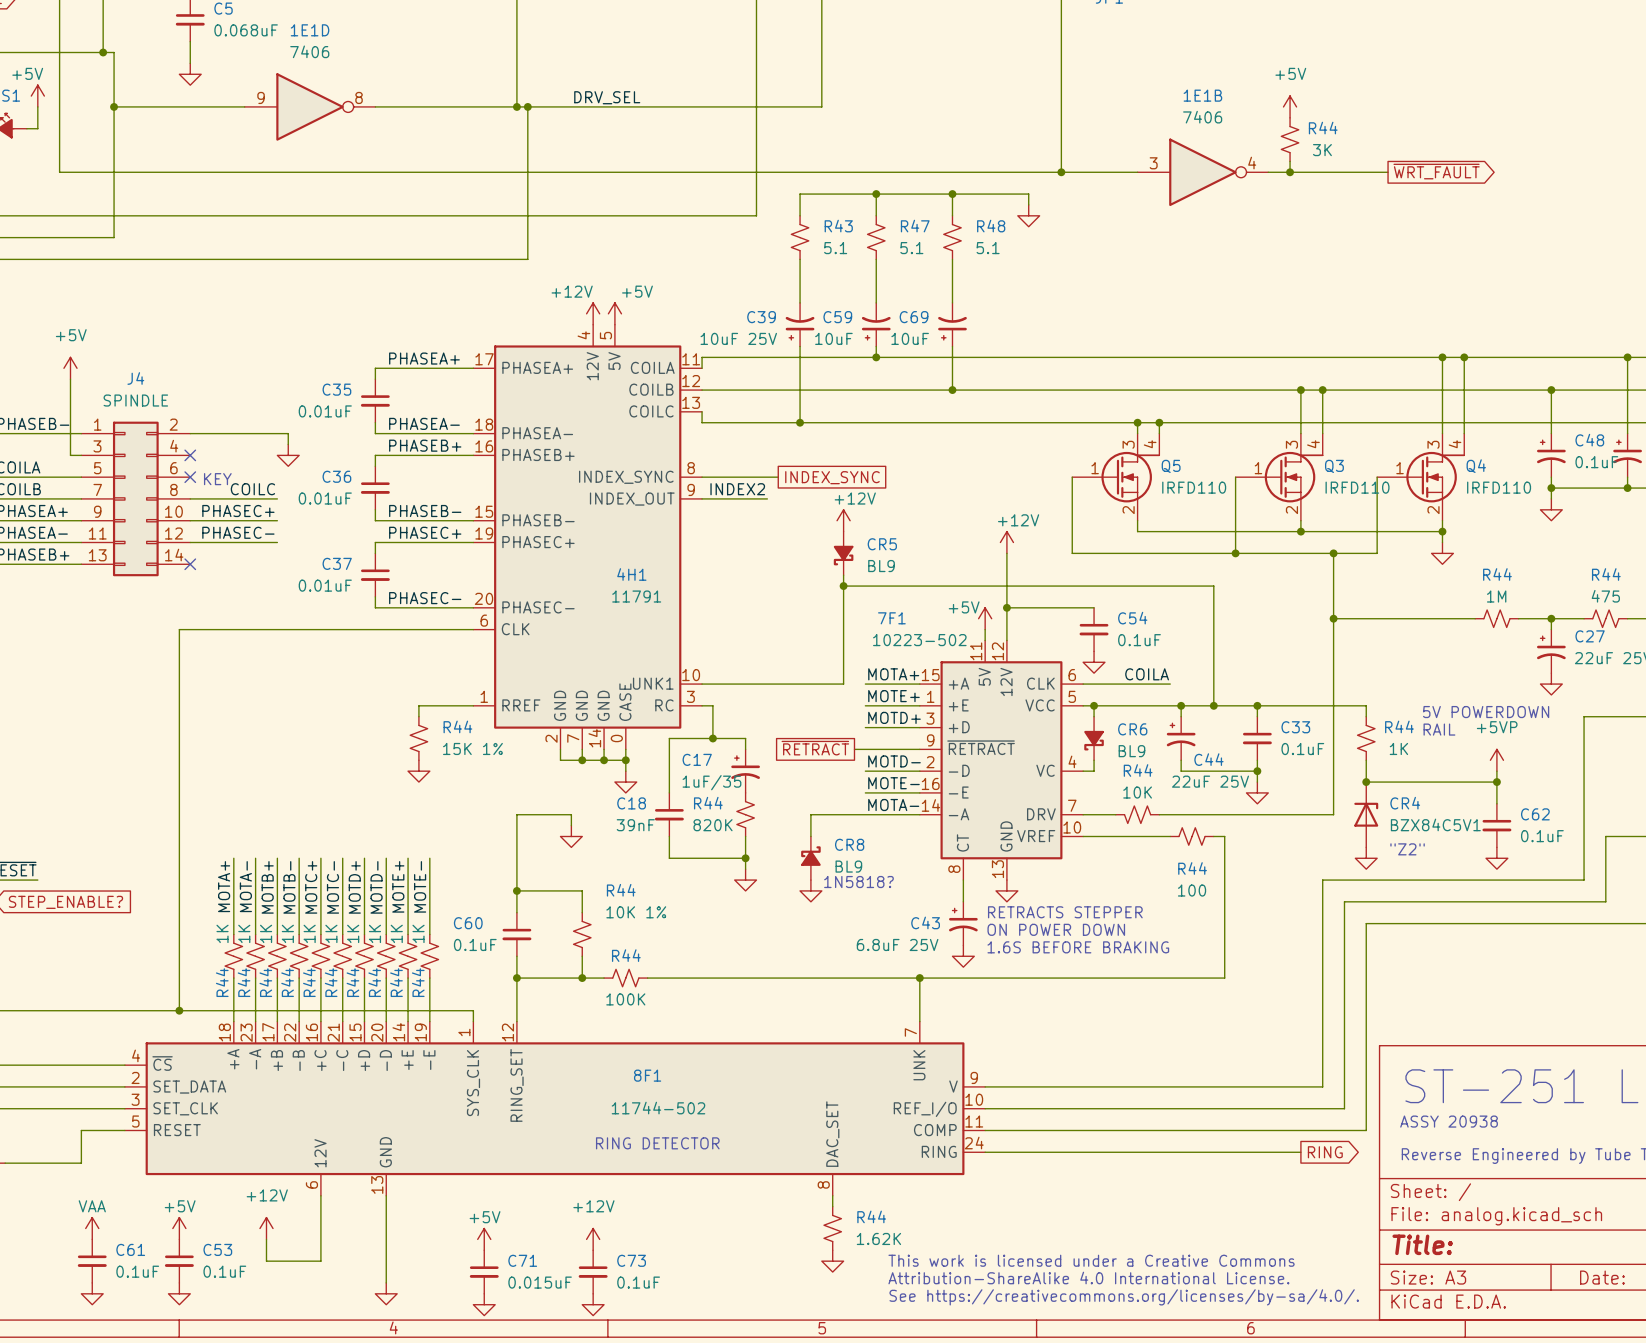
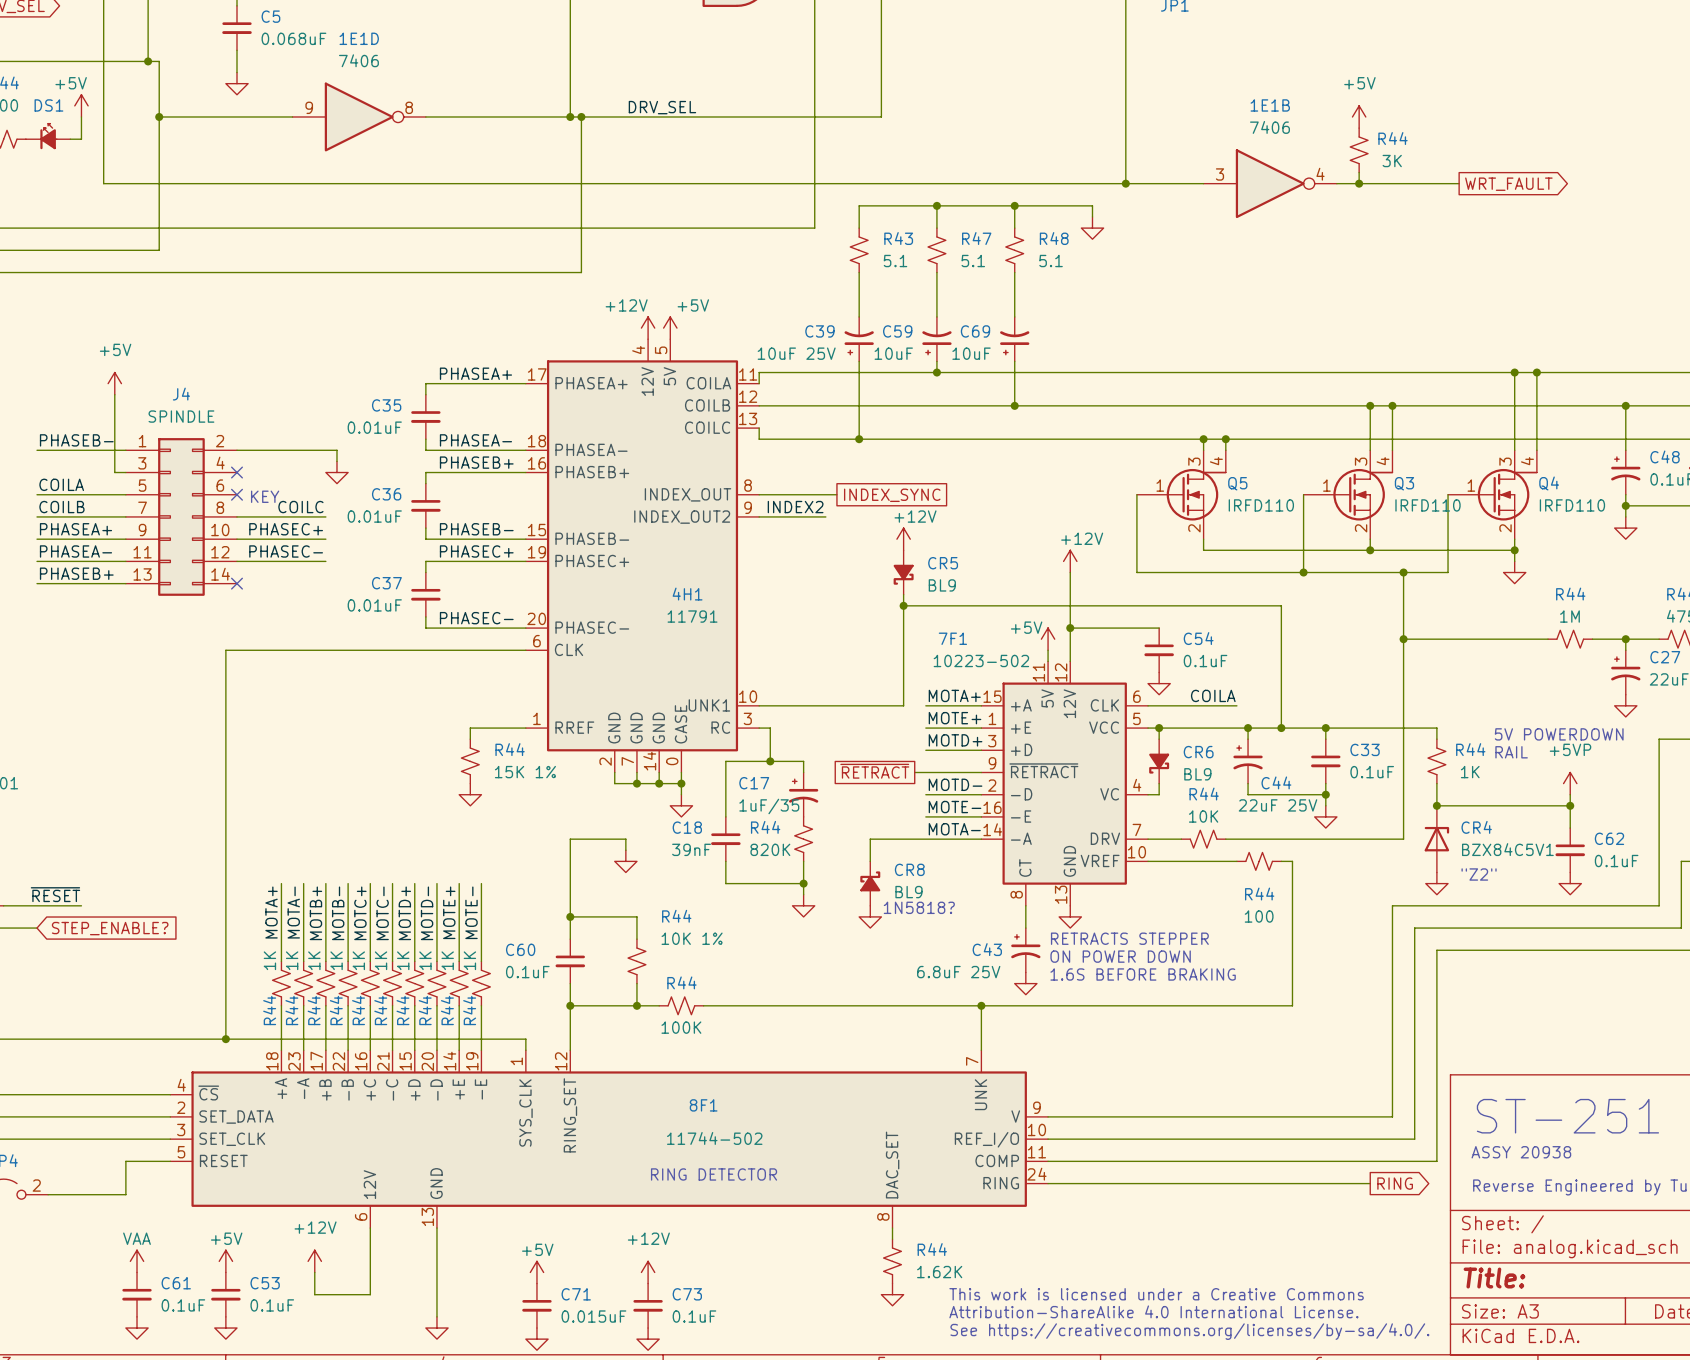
global label: ~{WRT_FAULT} (1436, 171) -> WRT_FAULT (1508, 184)
4H1 pin name: INDEX_SYNC (626, 477) -> INDEX_OUT (687, 494)
4H1 pin name: INDEX_OUT (632, 499) -> INDEX_OUT2 (682, 517)

